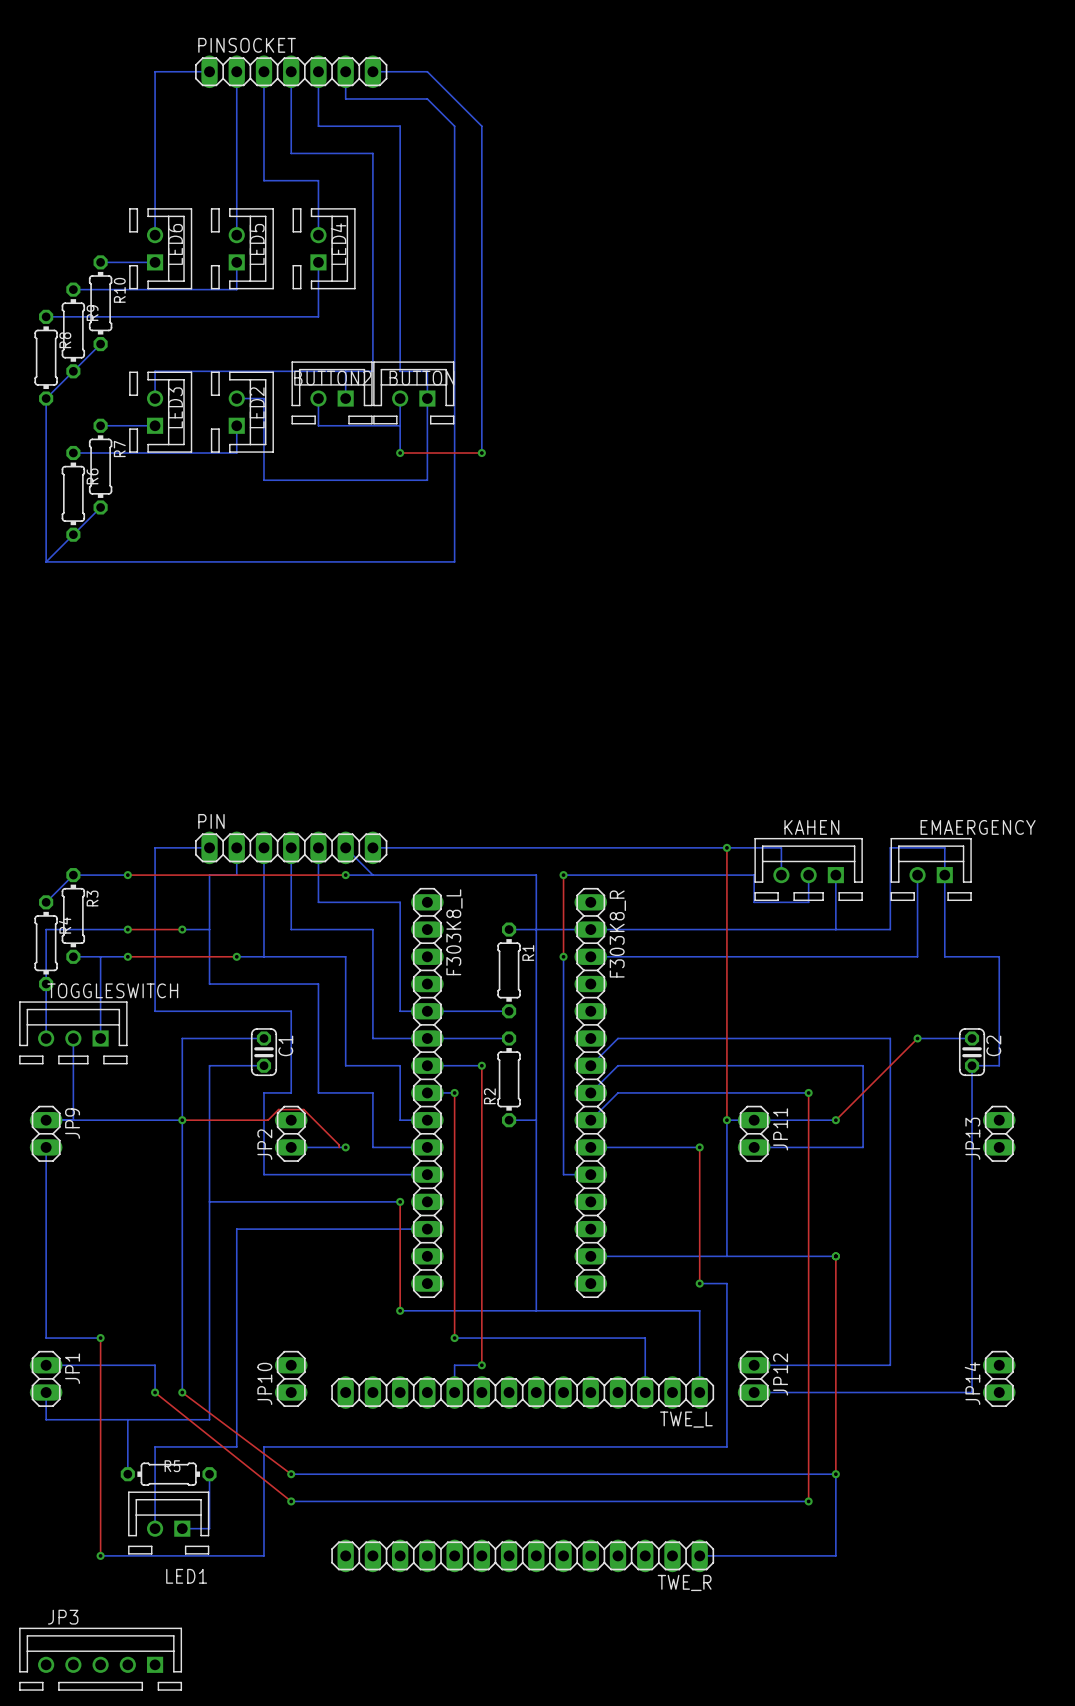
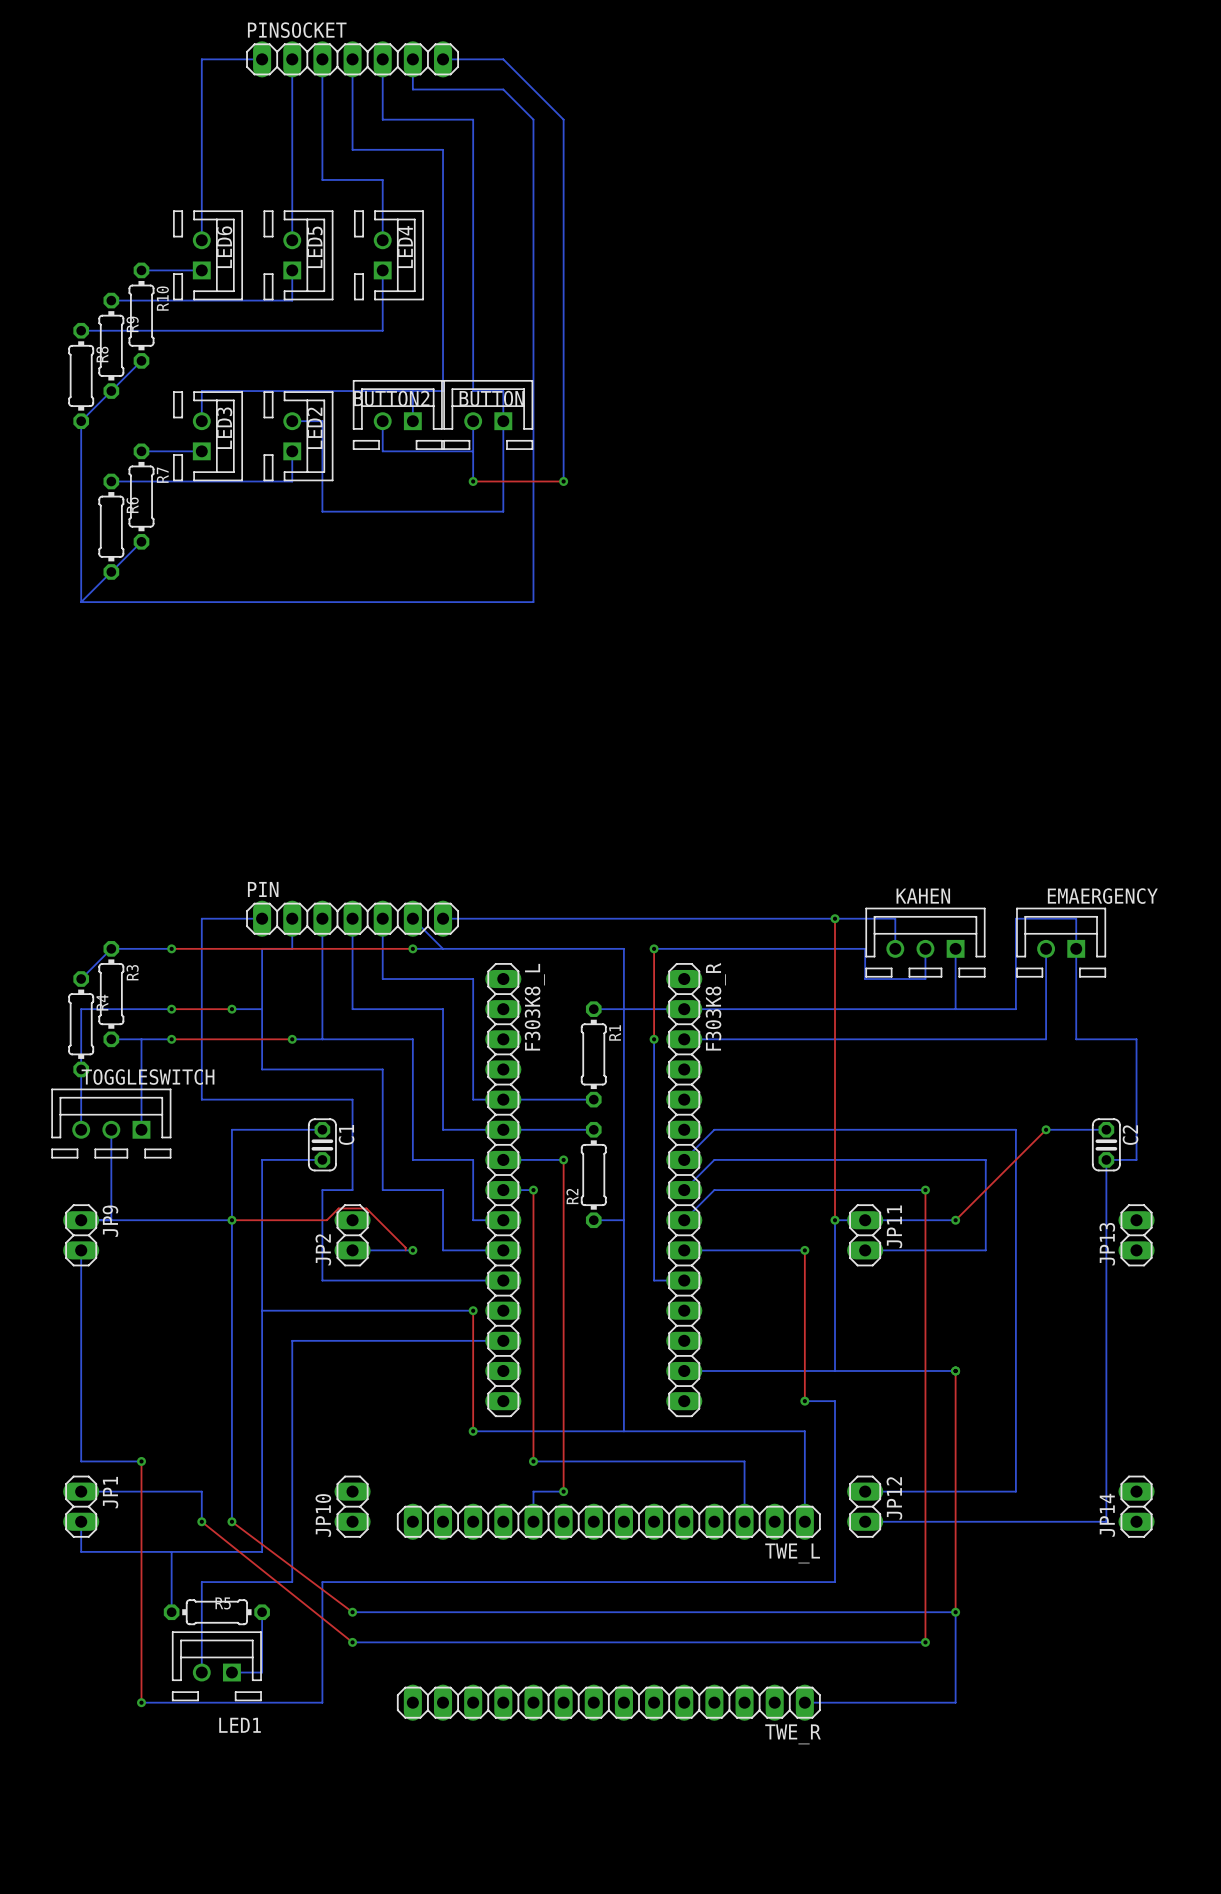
JP3: (100, 1659) -> none

